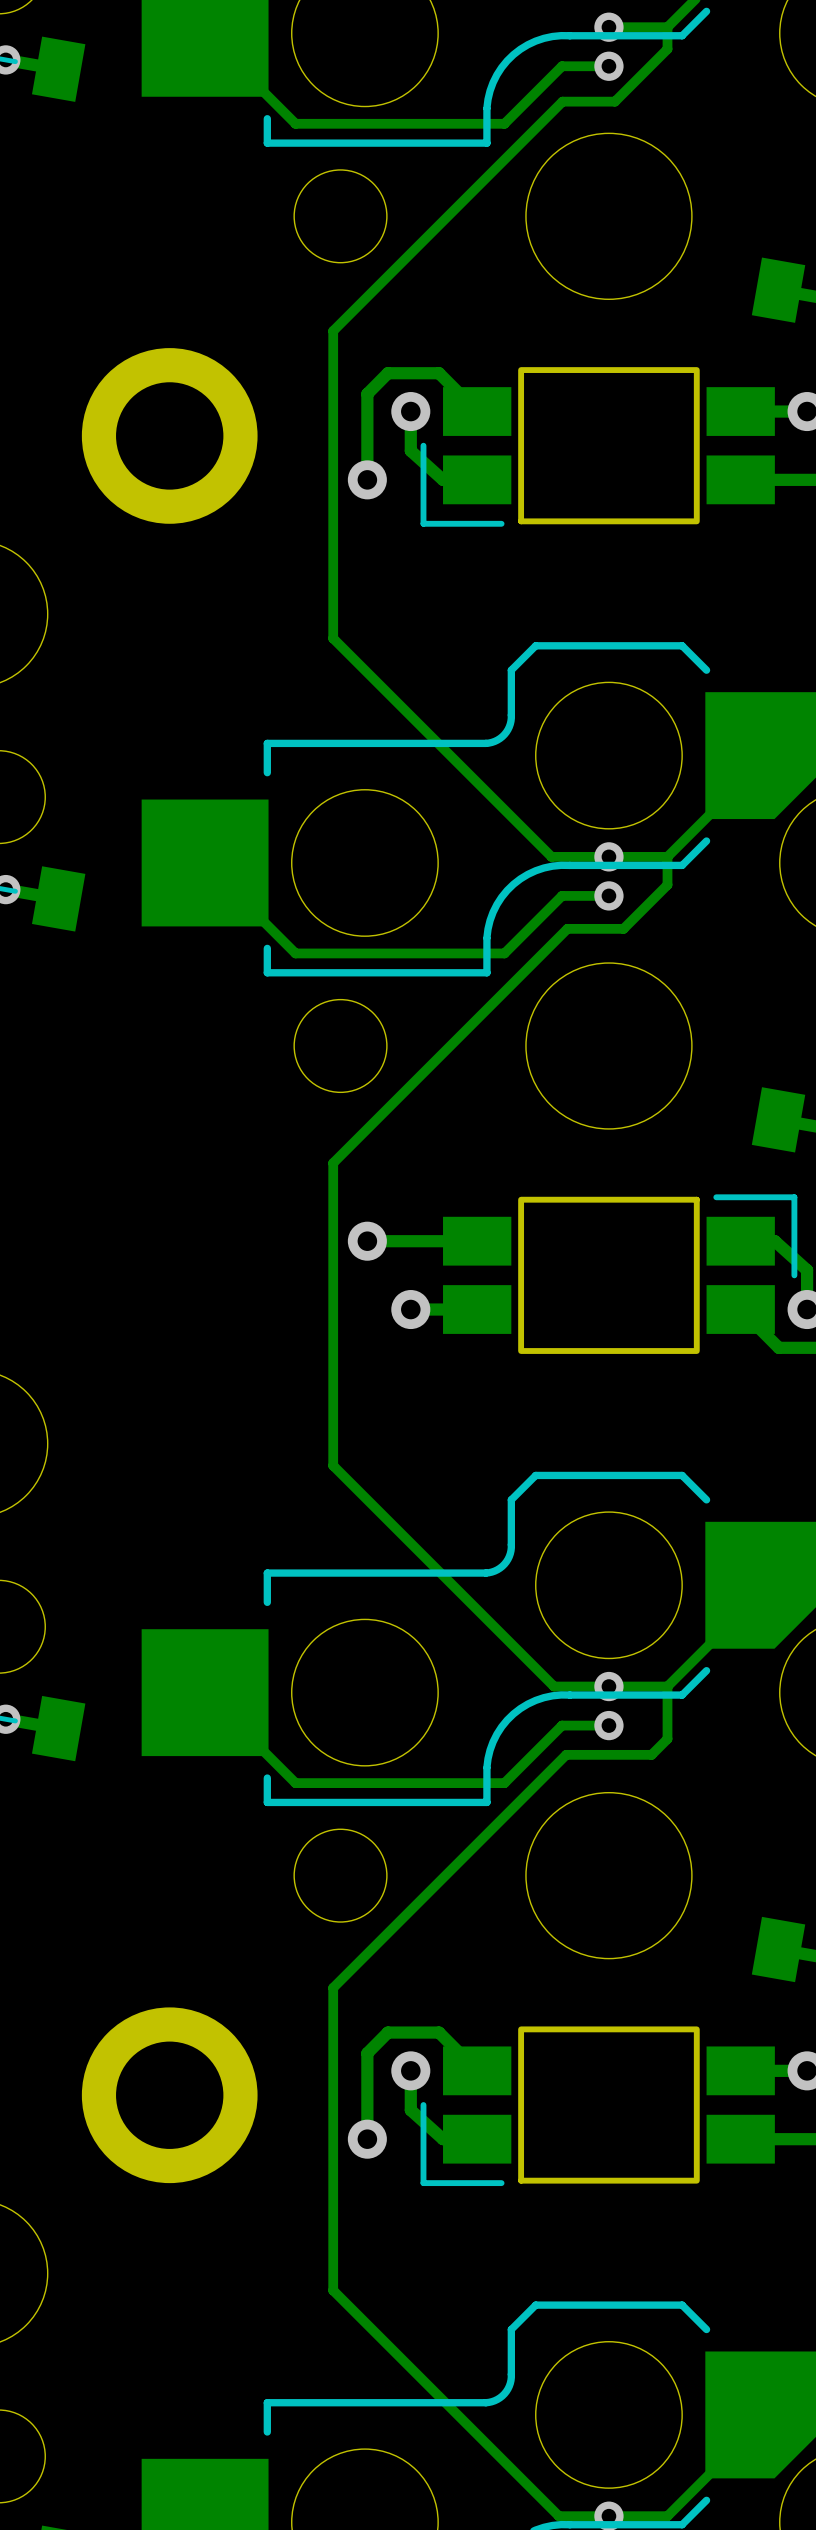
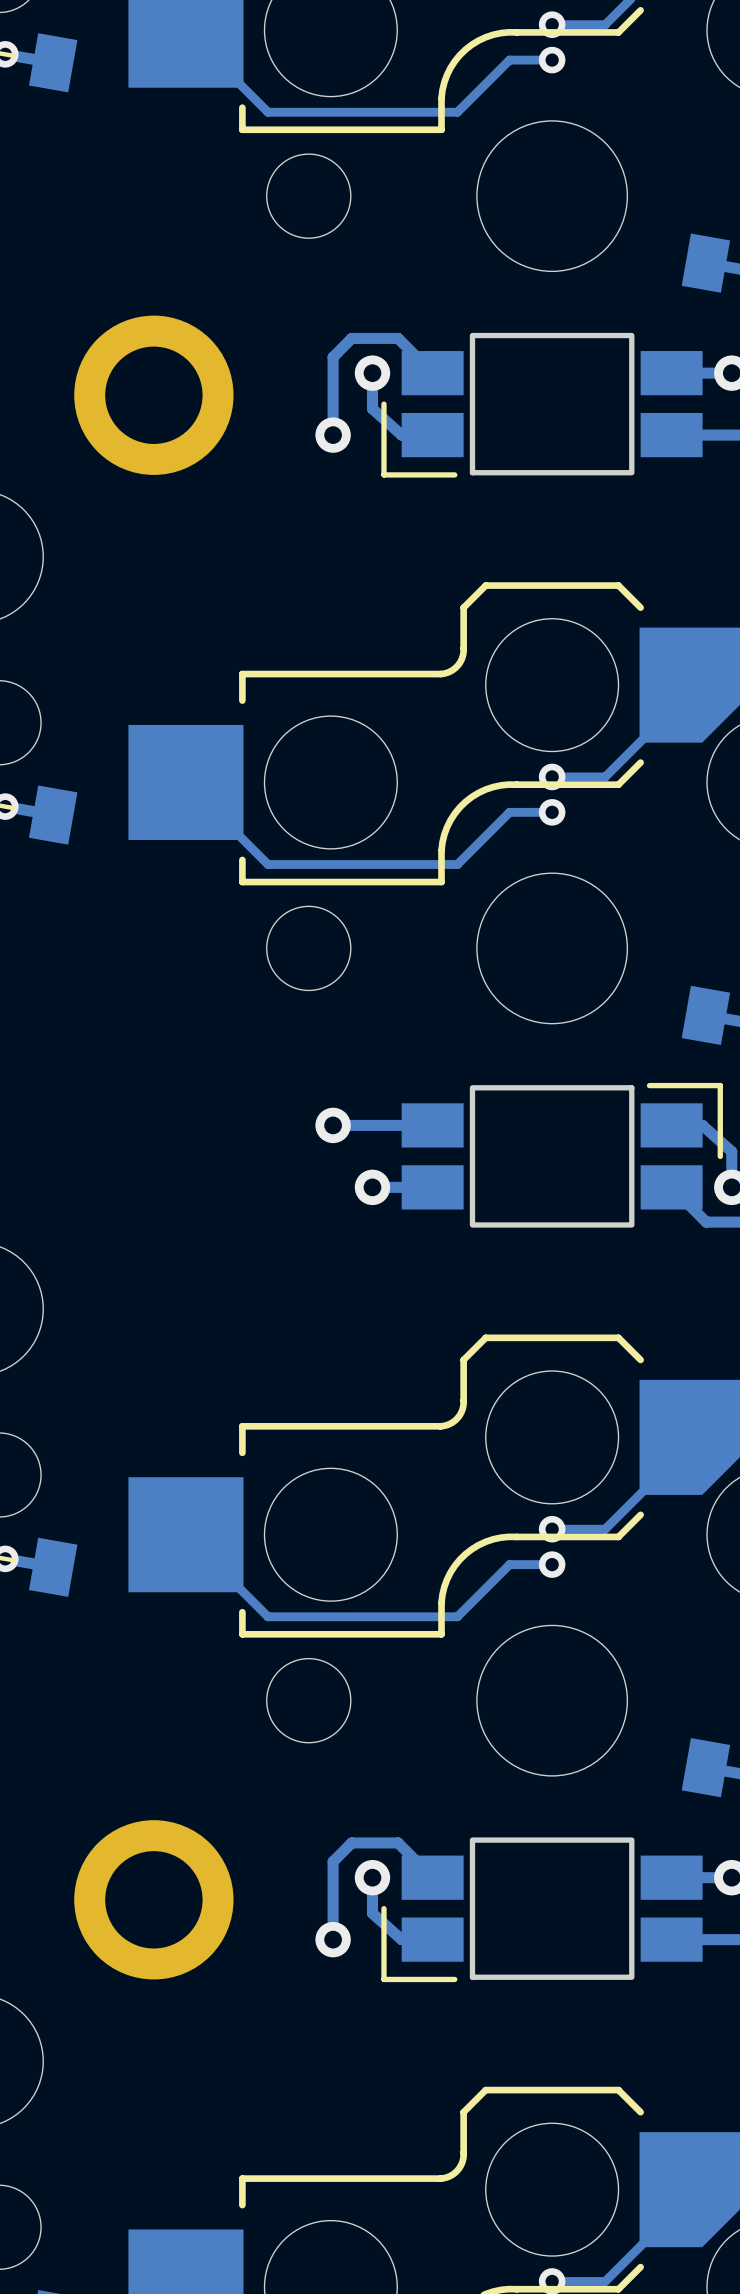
track: (667, 27) (667, 49) (614, 101) (562, 101) (333, 331) (333, 638) (551, 856) (608, 856) -> none
track: (667, 856) (667, 884) (623, 928) (567, 928) (333, 1163) (333, 1465) (554, 1686) (608, 1686) -> none
track: (667, 1686) (667, 1738) (651, 1754) (566, 1754) (333, 1987) (333, 2290) (558, 2516) (608, 2516) -> none

